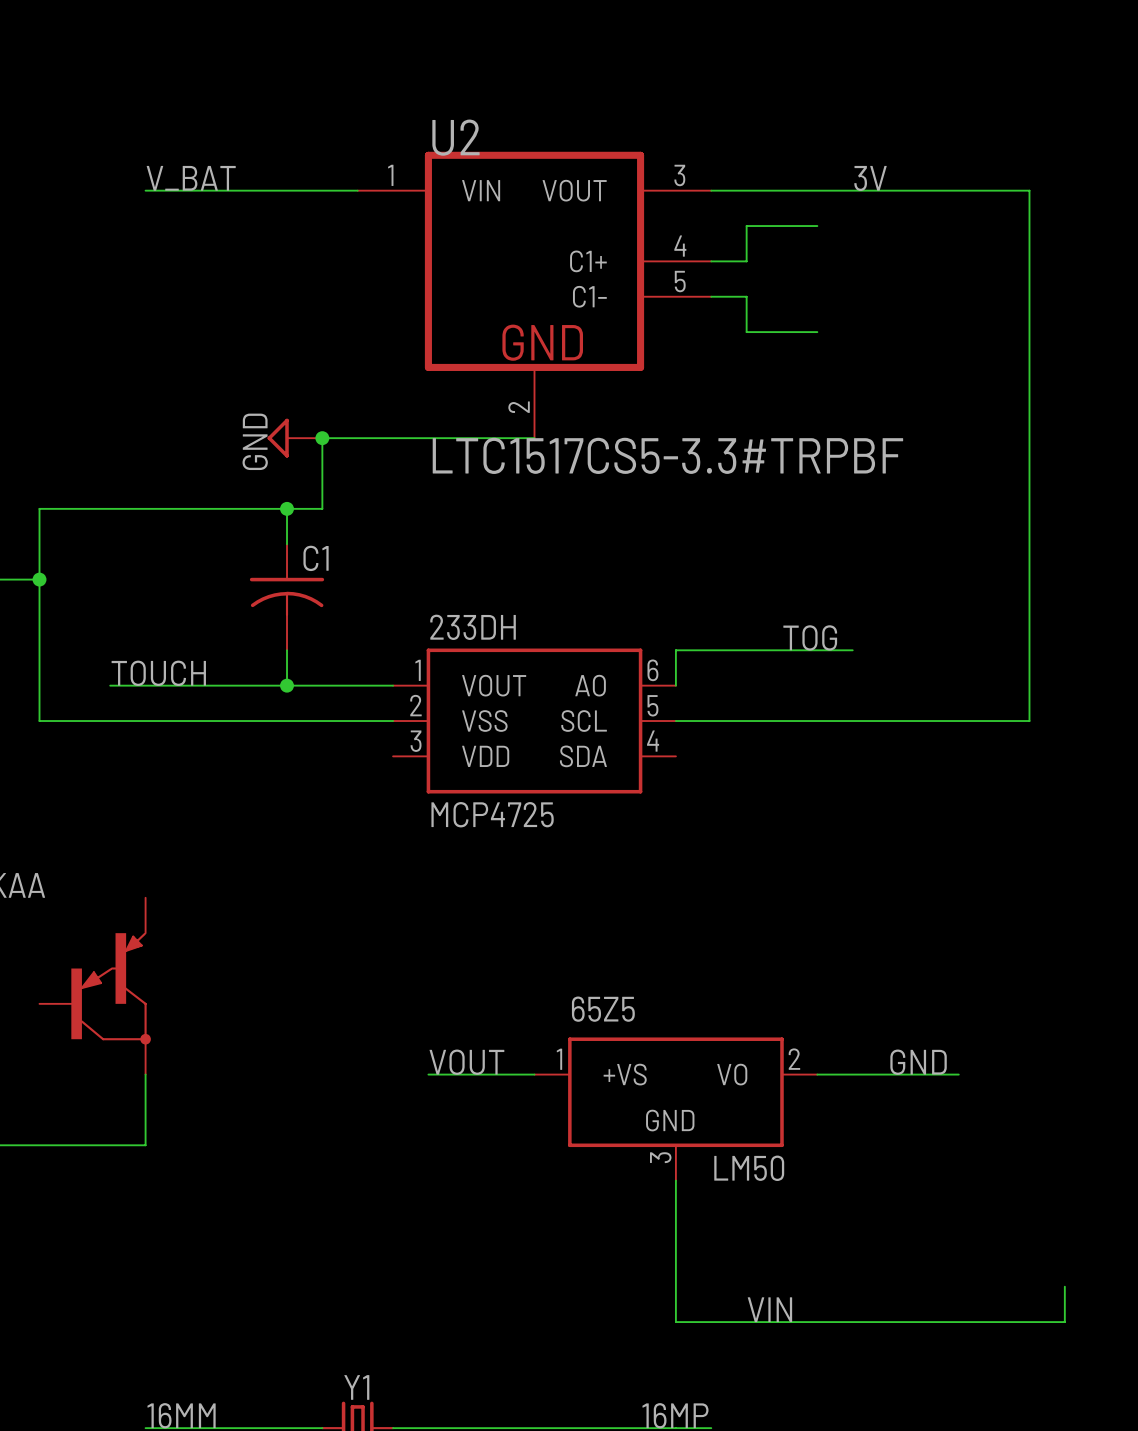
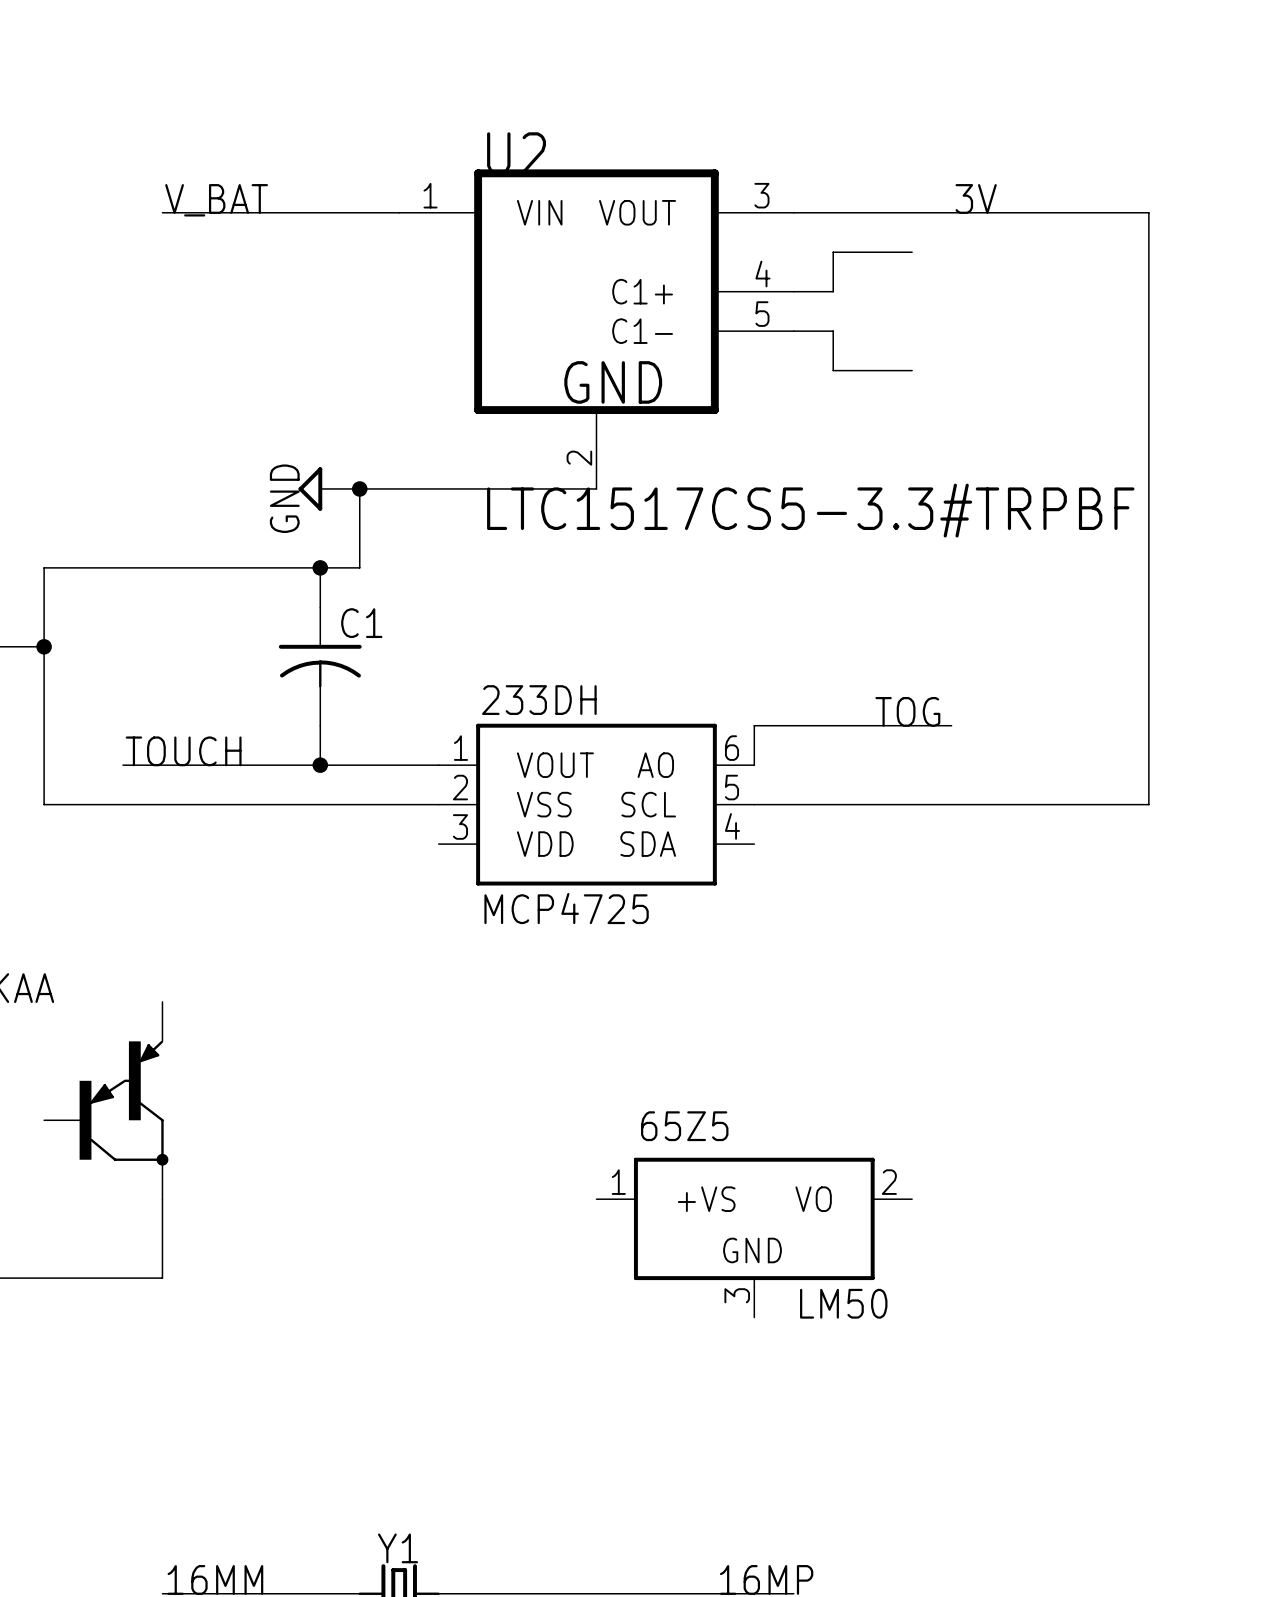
label: VOUT (466, 1062) -> none
label: GND (918, 1062) -> none
wire: (428, 1074) (534, 1074) -> none
wire: (817, 1074) (958, 1074) -> none
wire: (675, 1180) (675, 1322) (1064, 1322) (1064, 1286) -> none
label: VIN (769, 1309) -> none

